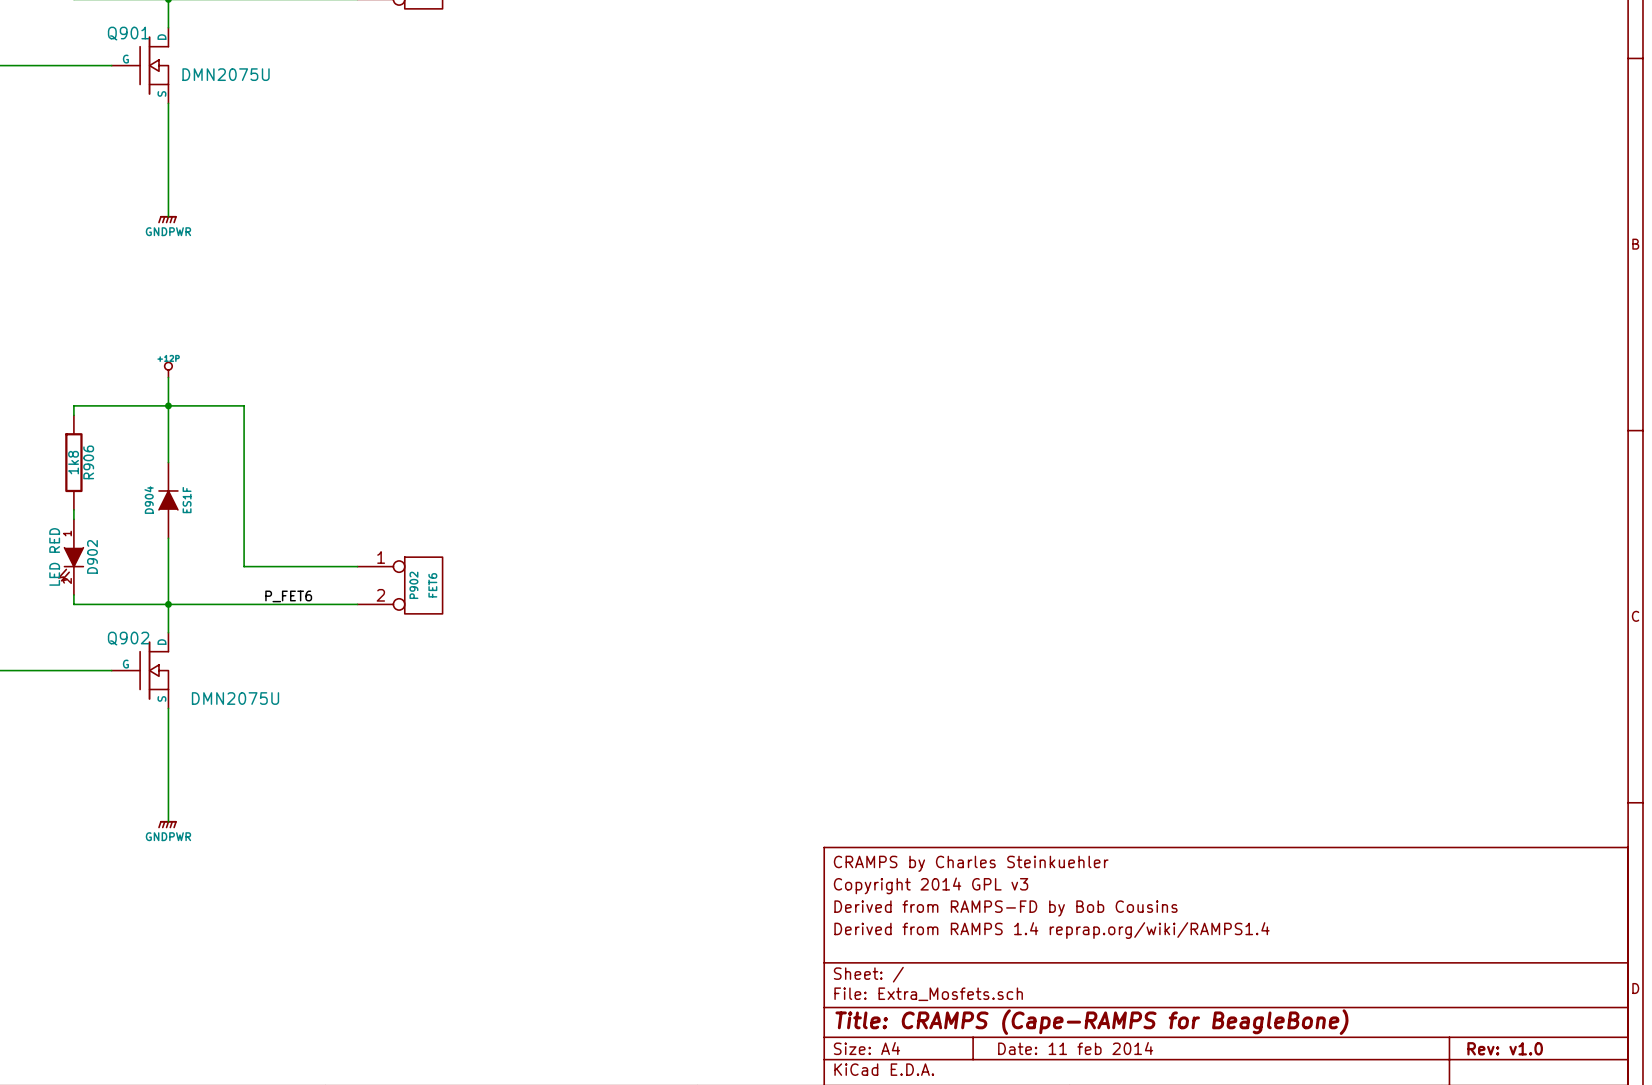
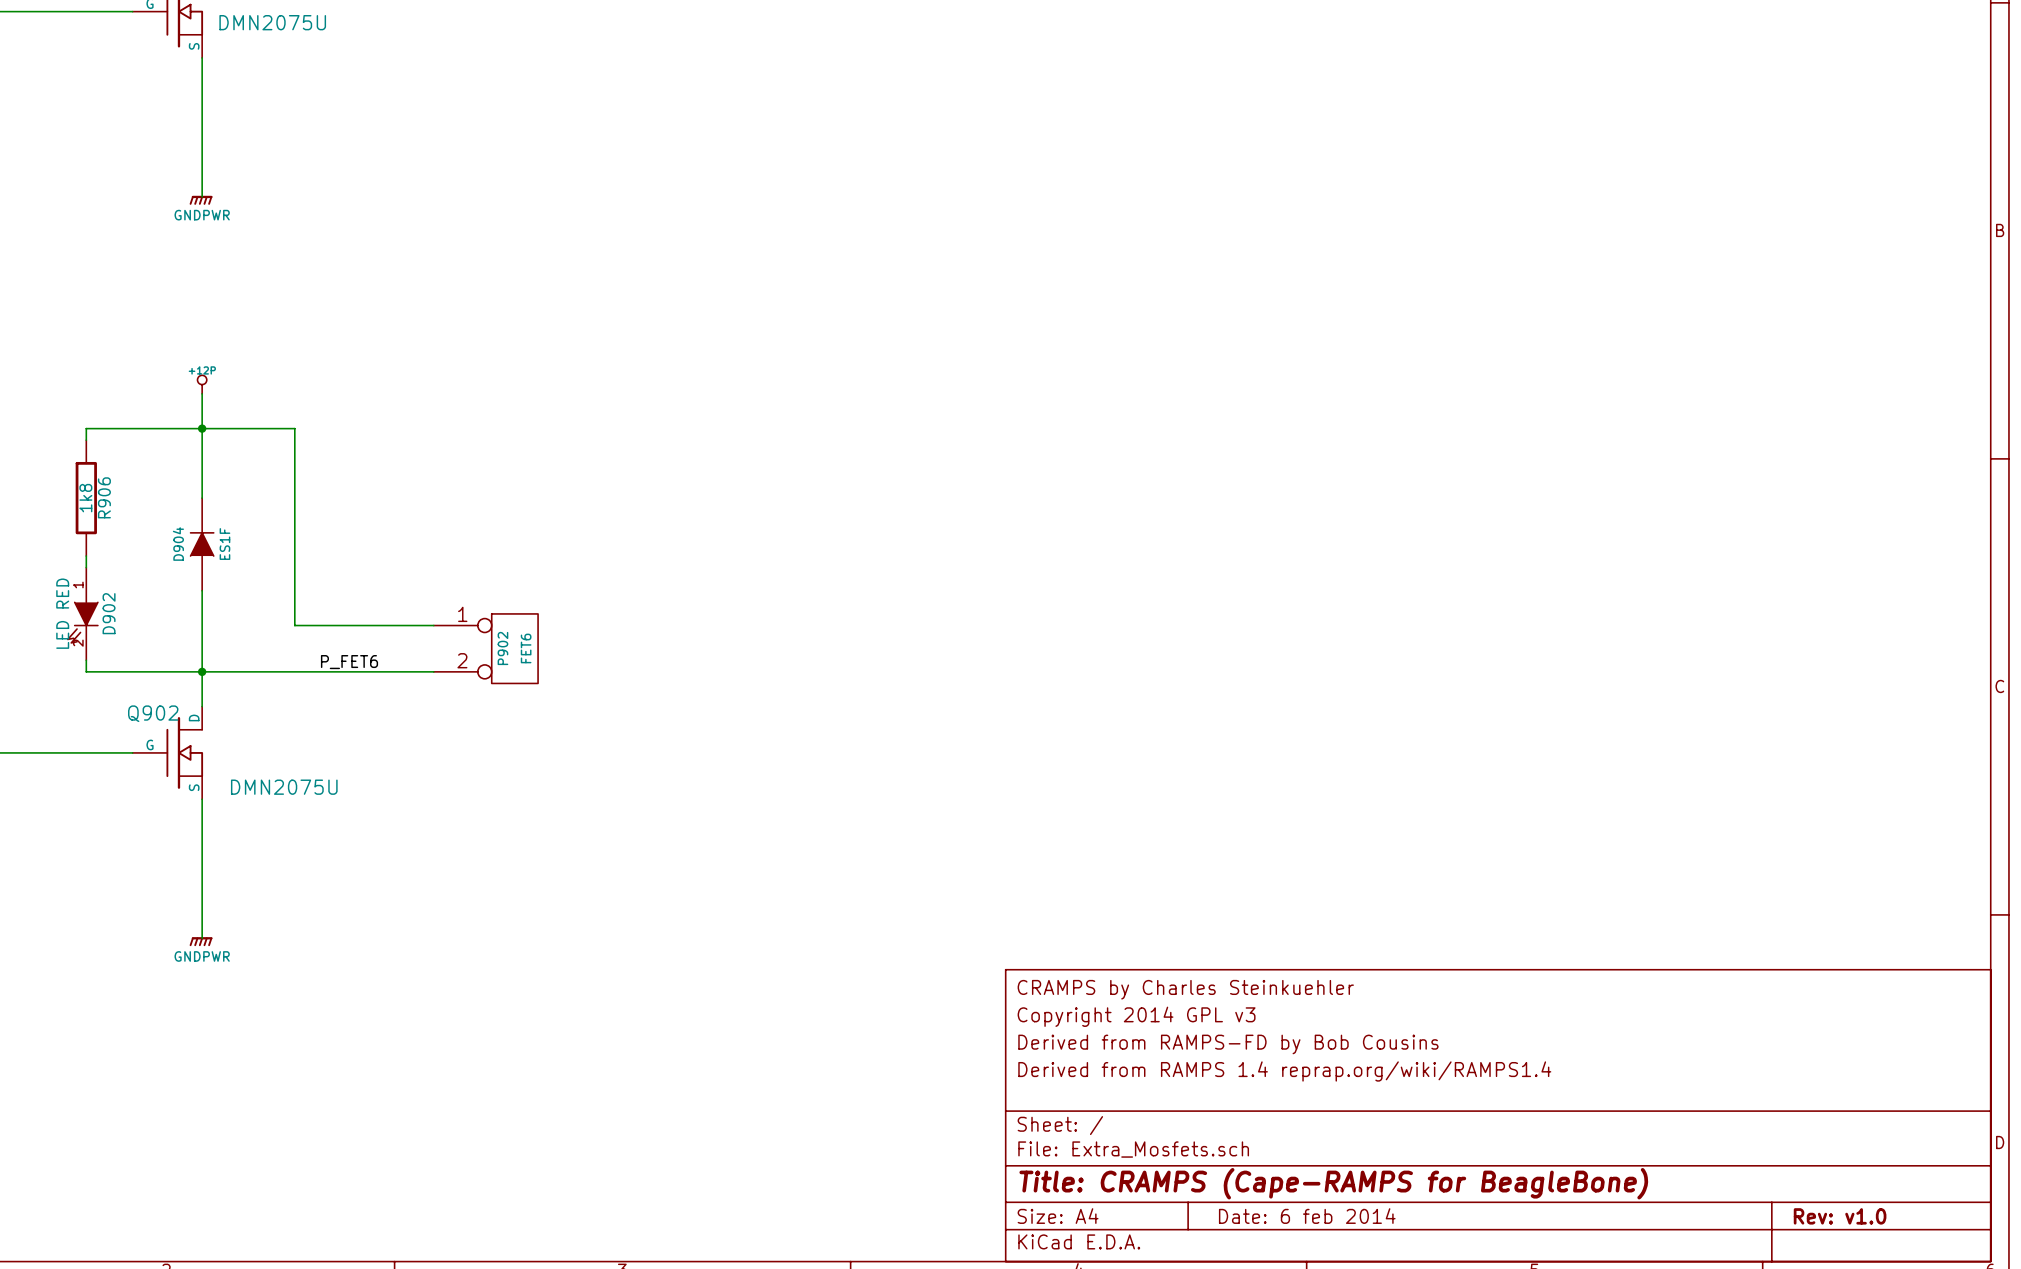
title block: Date: 11 feb 2014 (1075, 1048) -> Date: 6 feb 2014 (1307, 1216)

